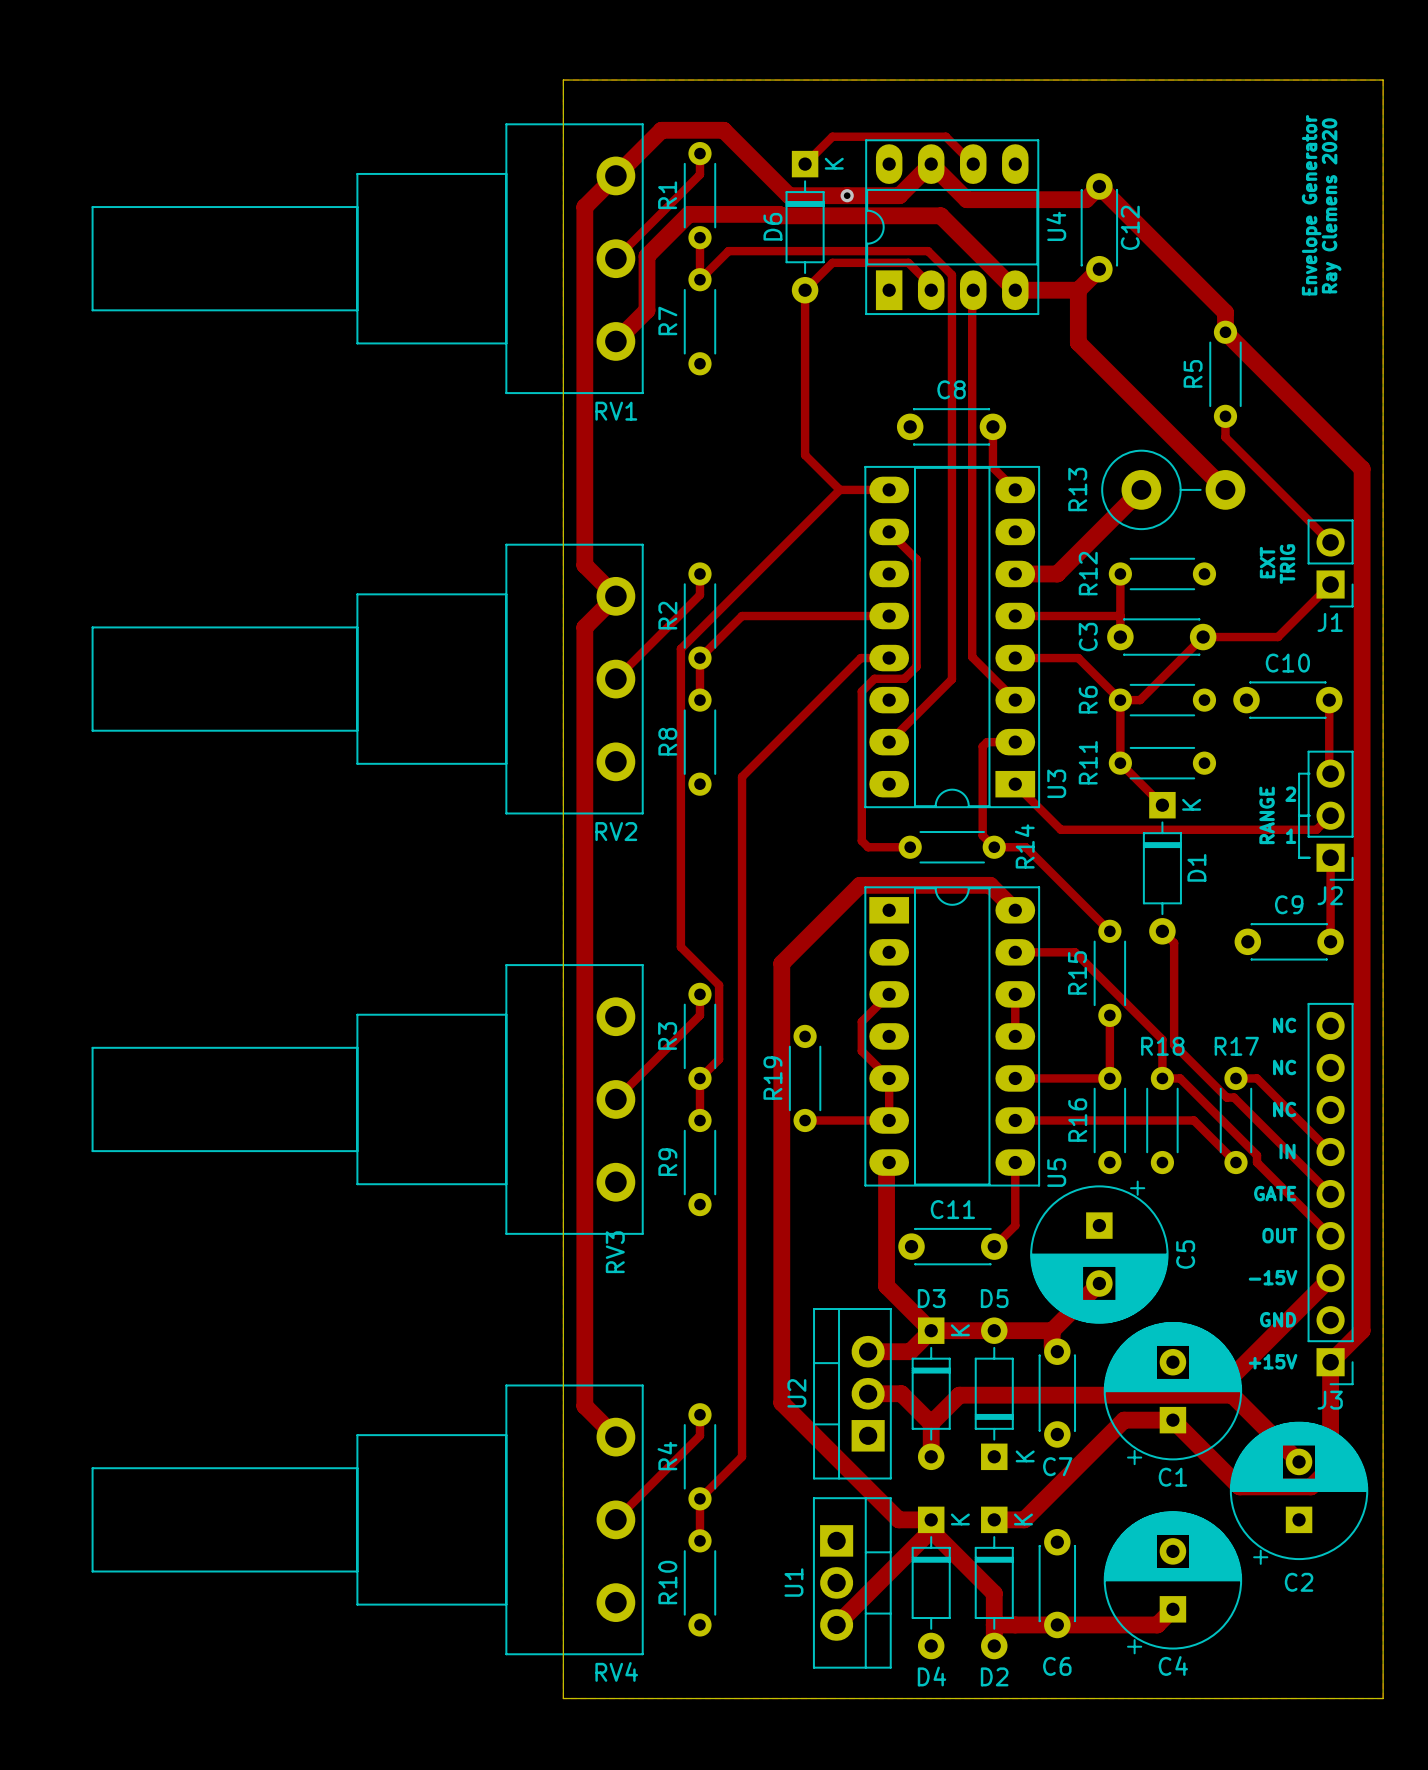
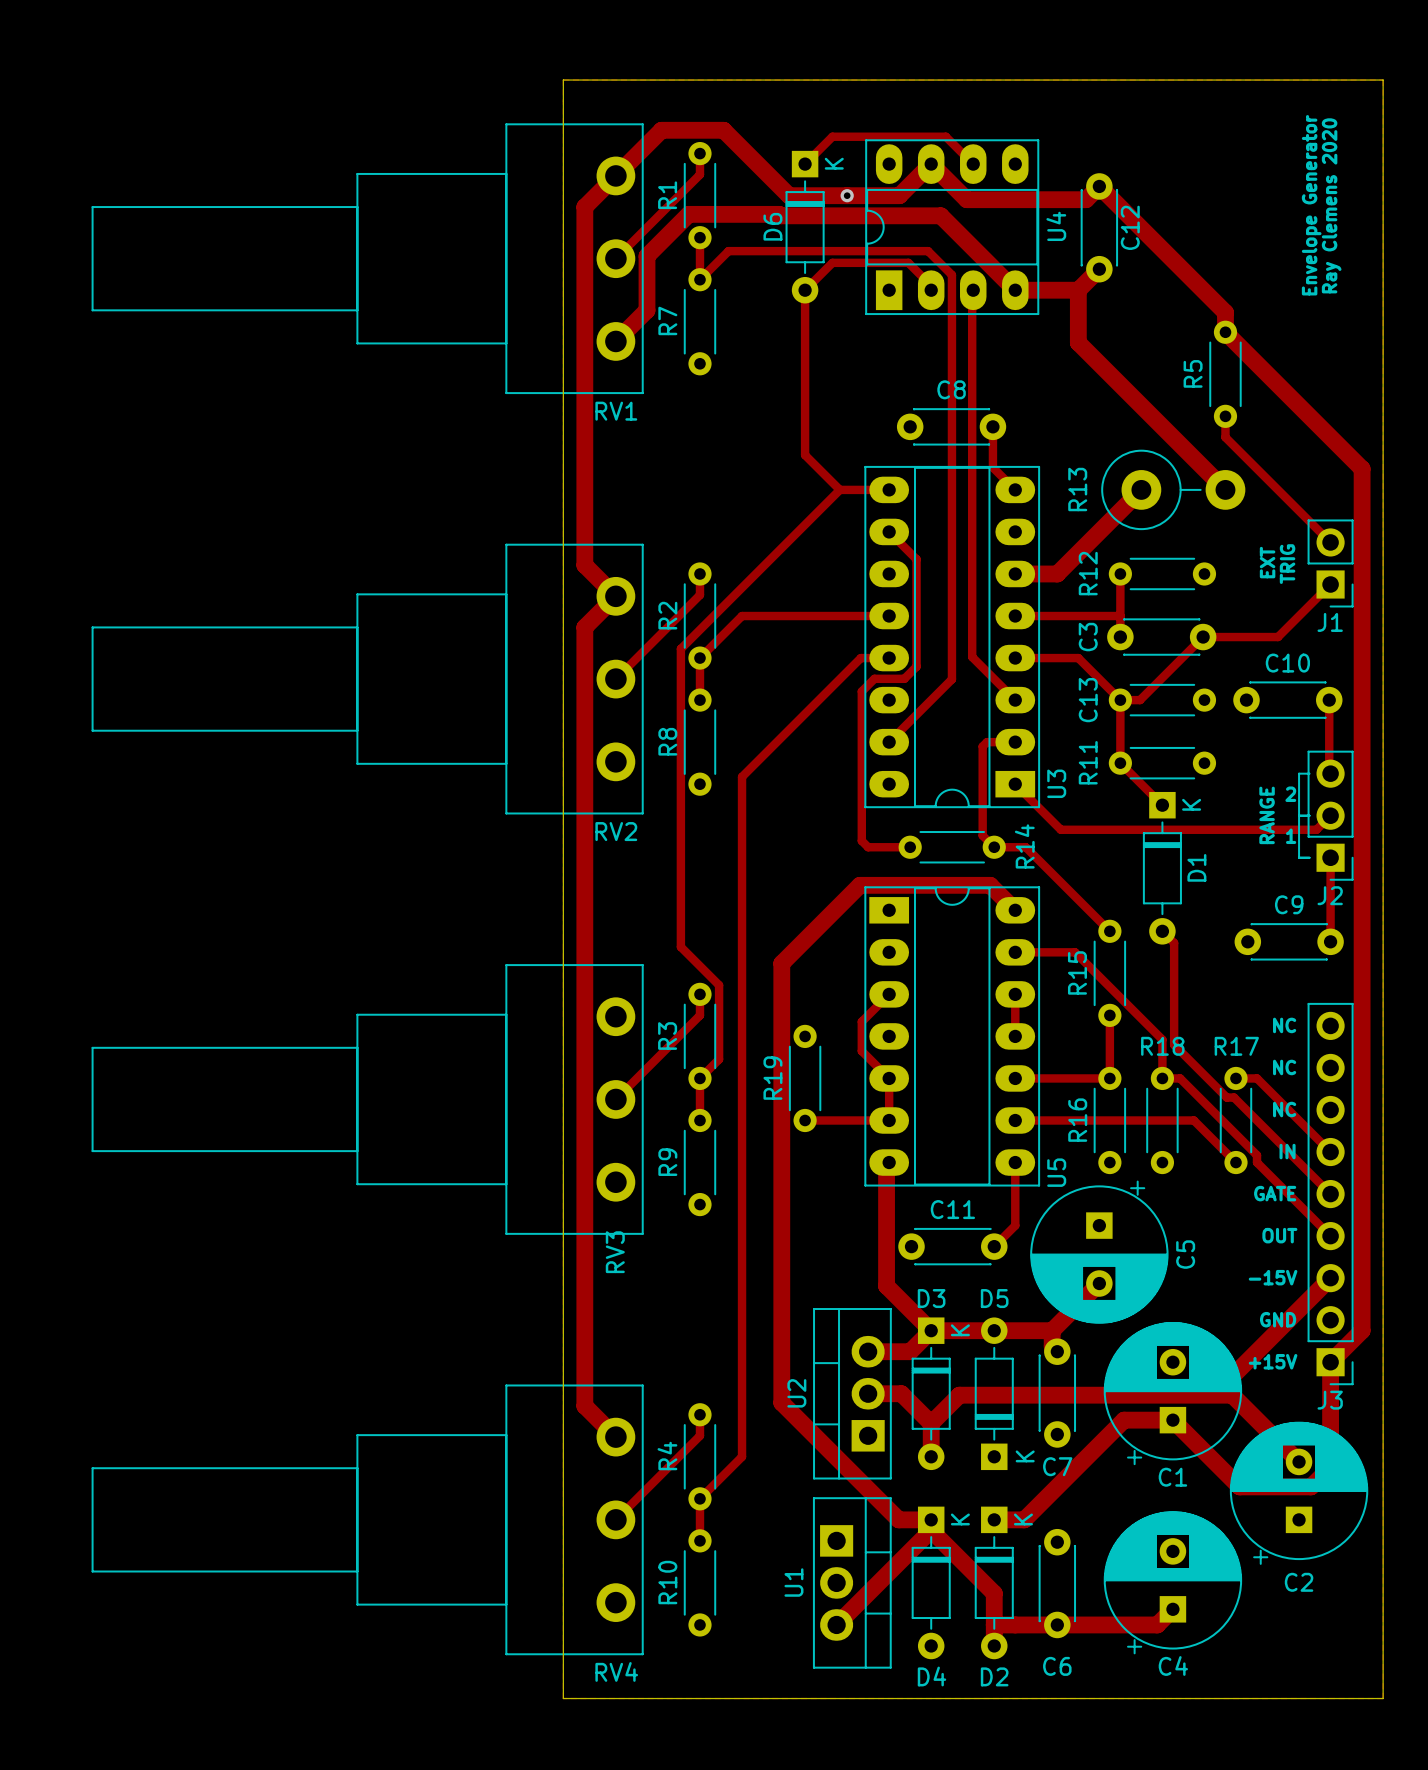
R6 name: R6 (1088, 699) -> C13 (1088, 700)

